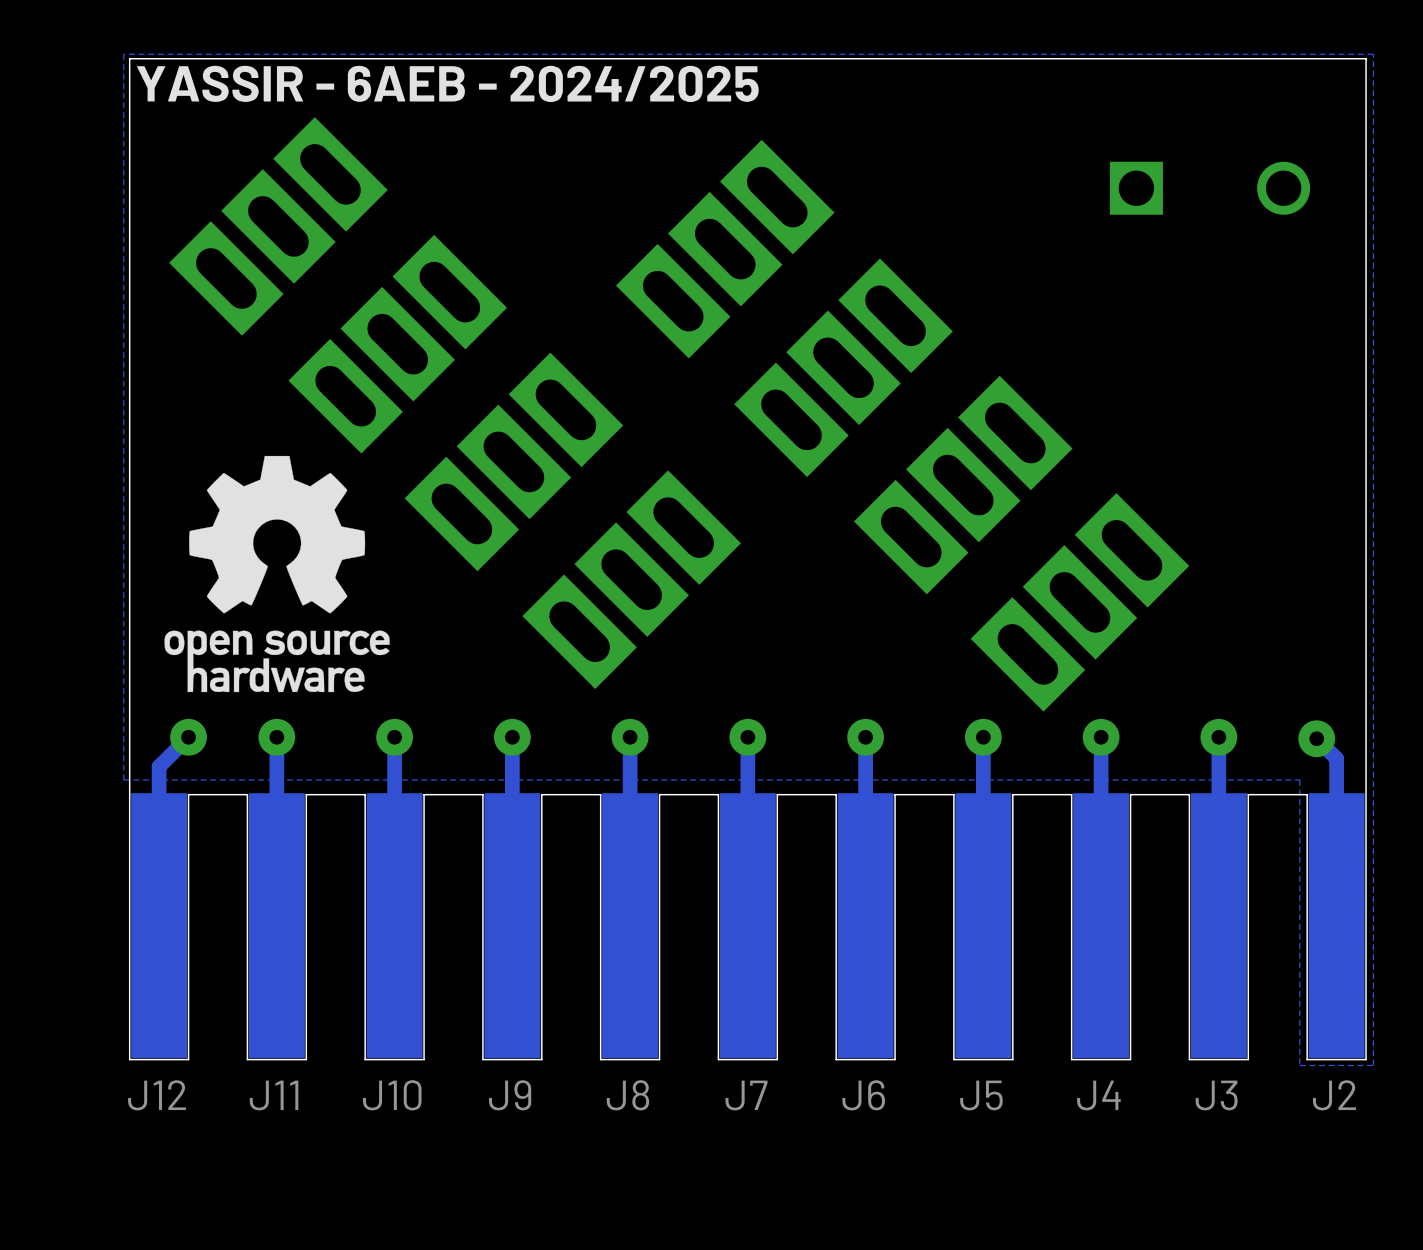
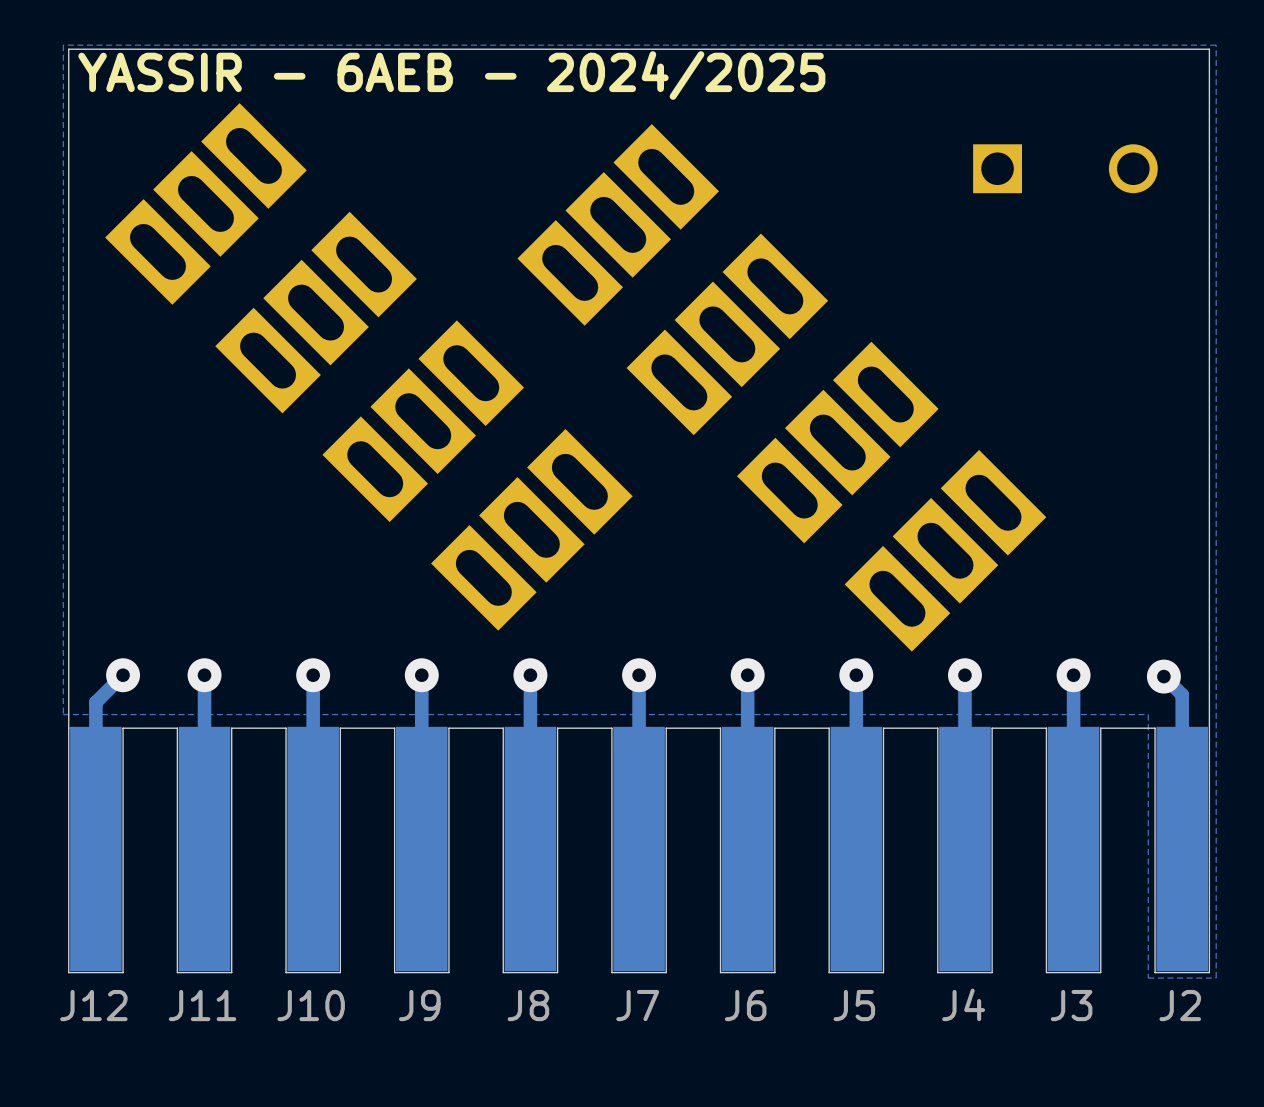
drawing: [164, 455, 390, 693] -> none

